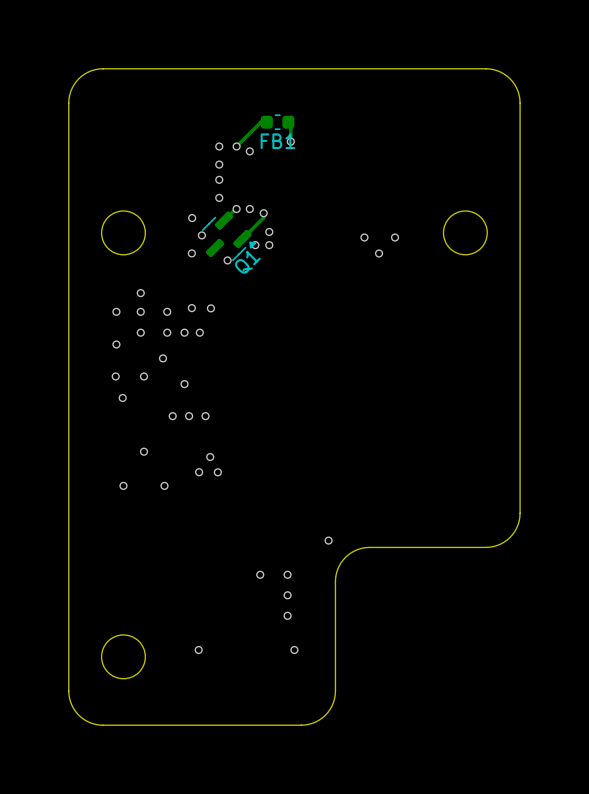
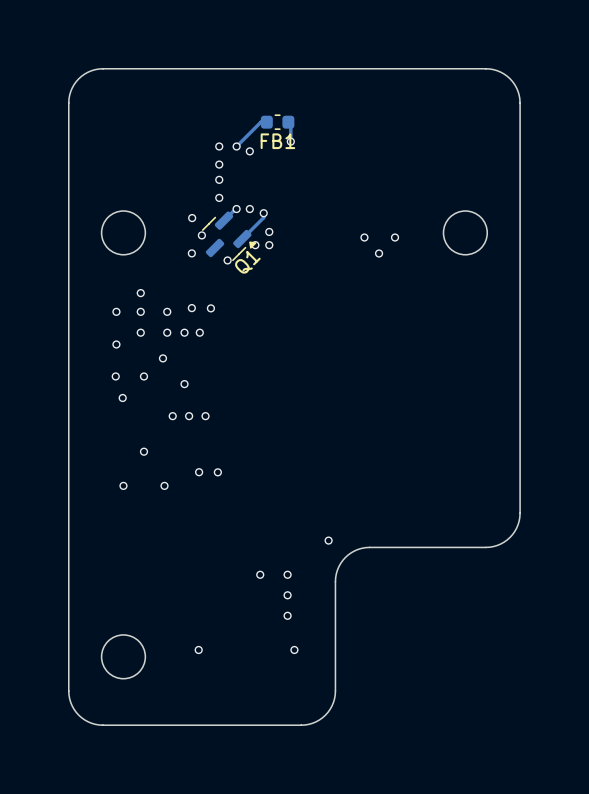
via: (210, 457) -> none

